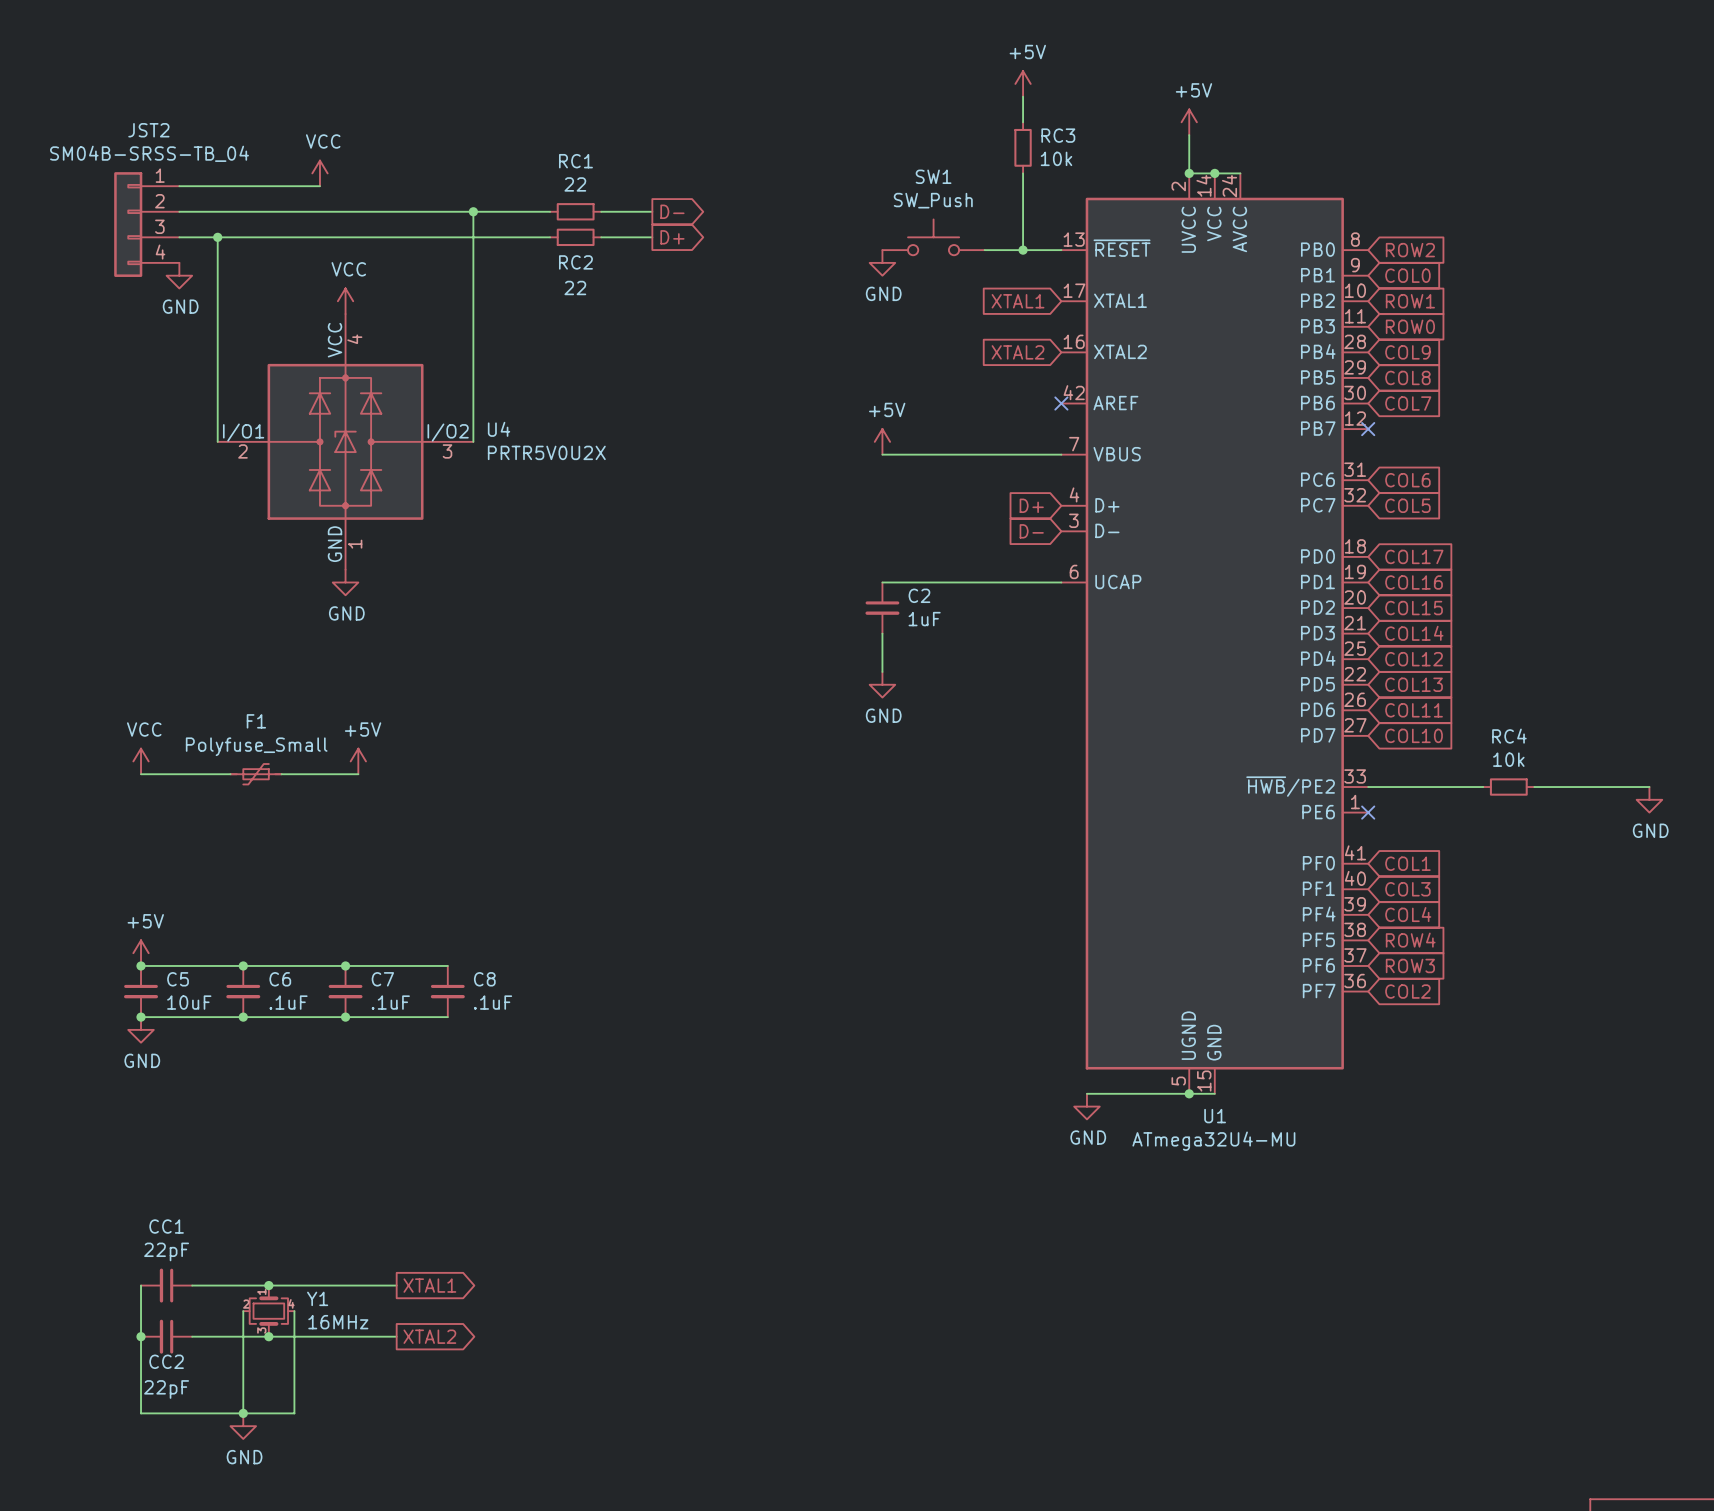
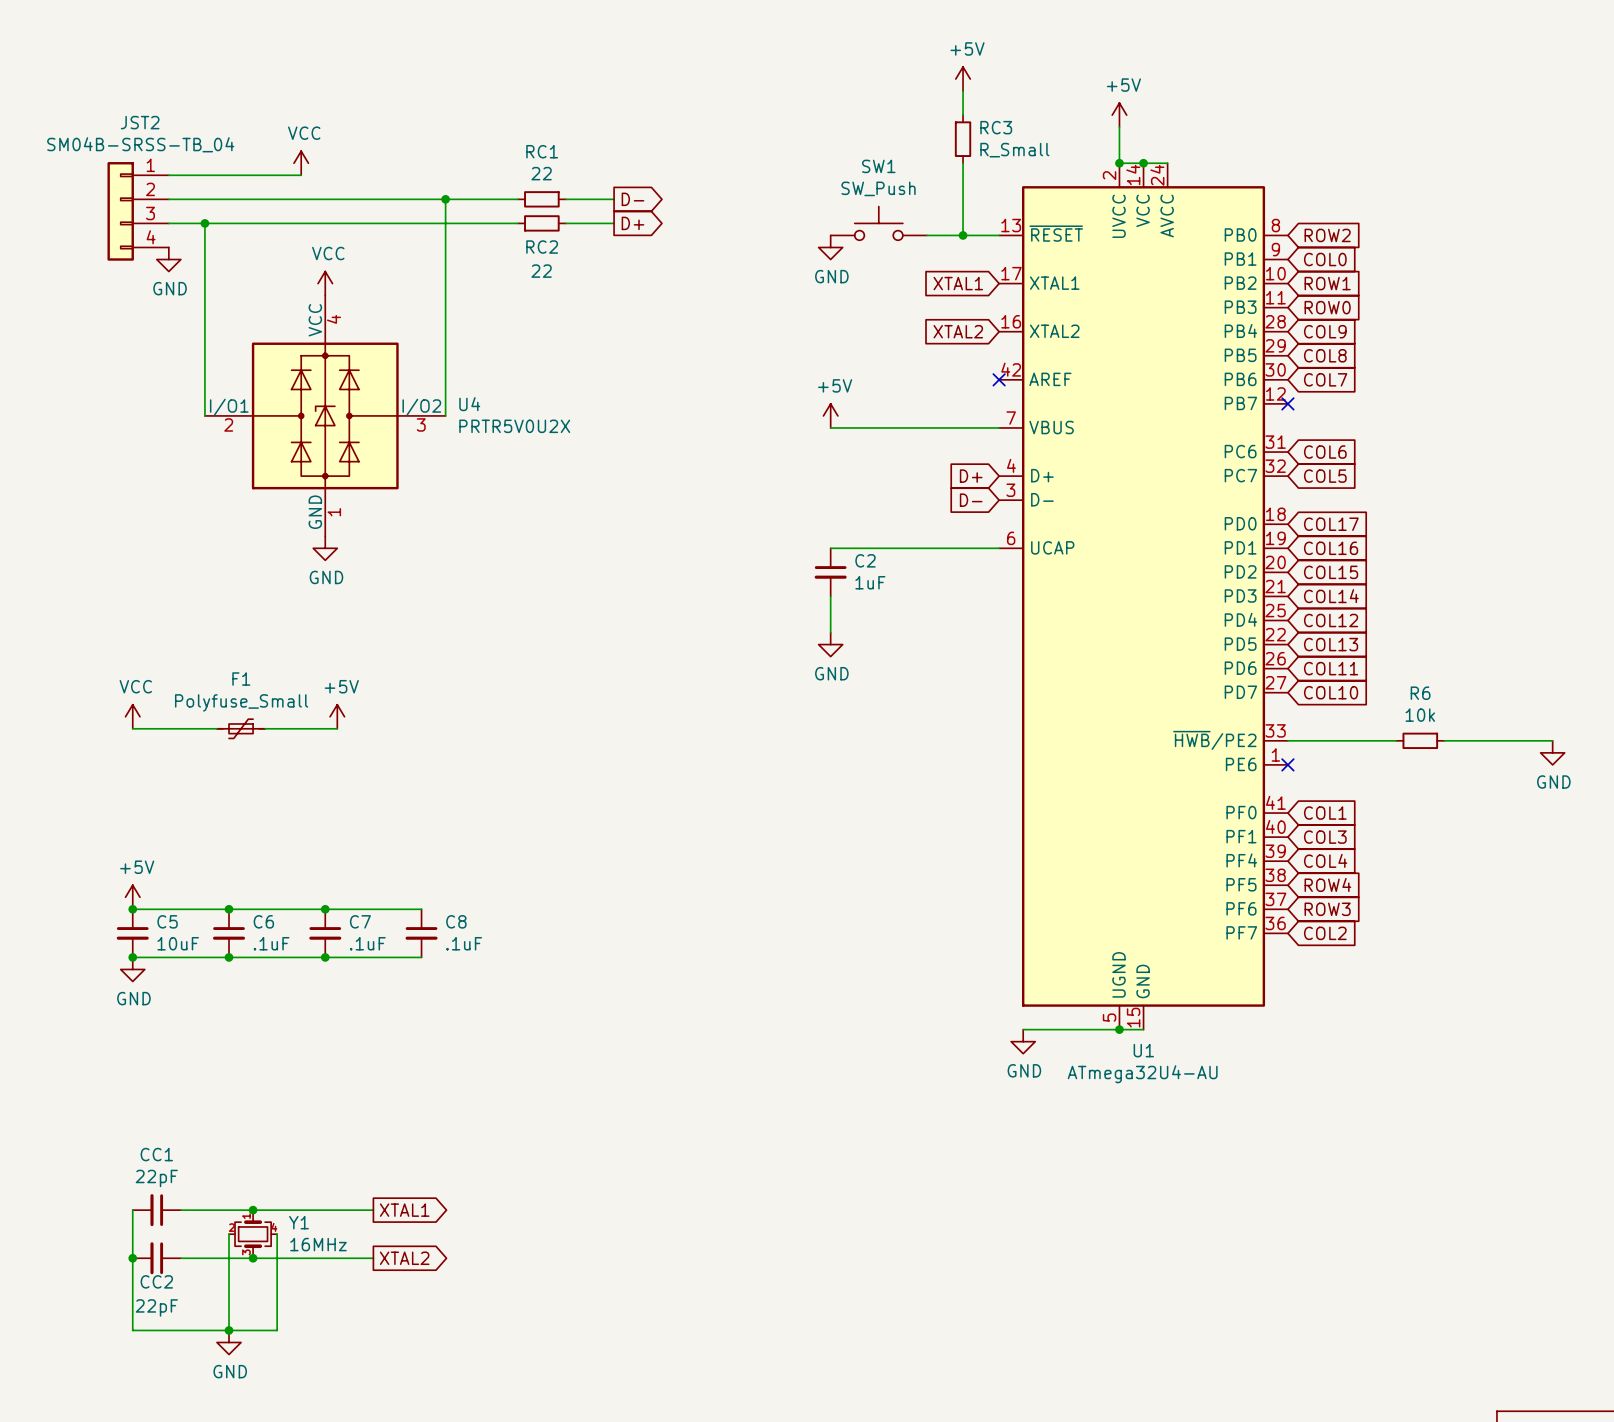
RC3 value: 10k (1056, 158) -> R_Small (1014, 150)
RC4 name: RC4 (1509, 736) -> R6 (1420, 693)
U1 value: ATmega32U4-MU (1213, 1141) -> ATmega32U4-AU (1142, 1074)

